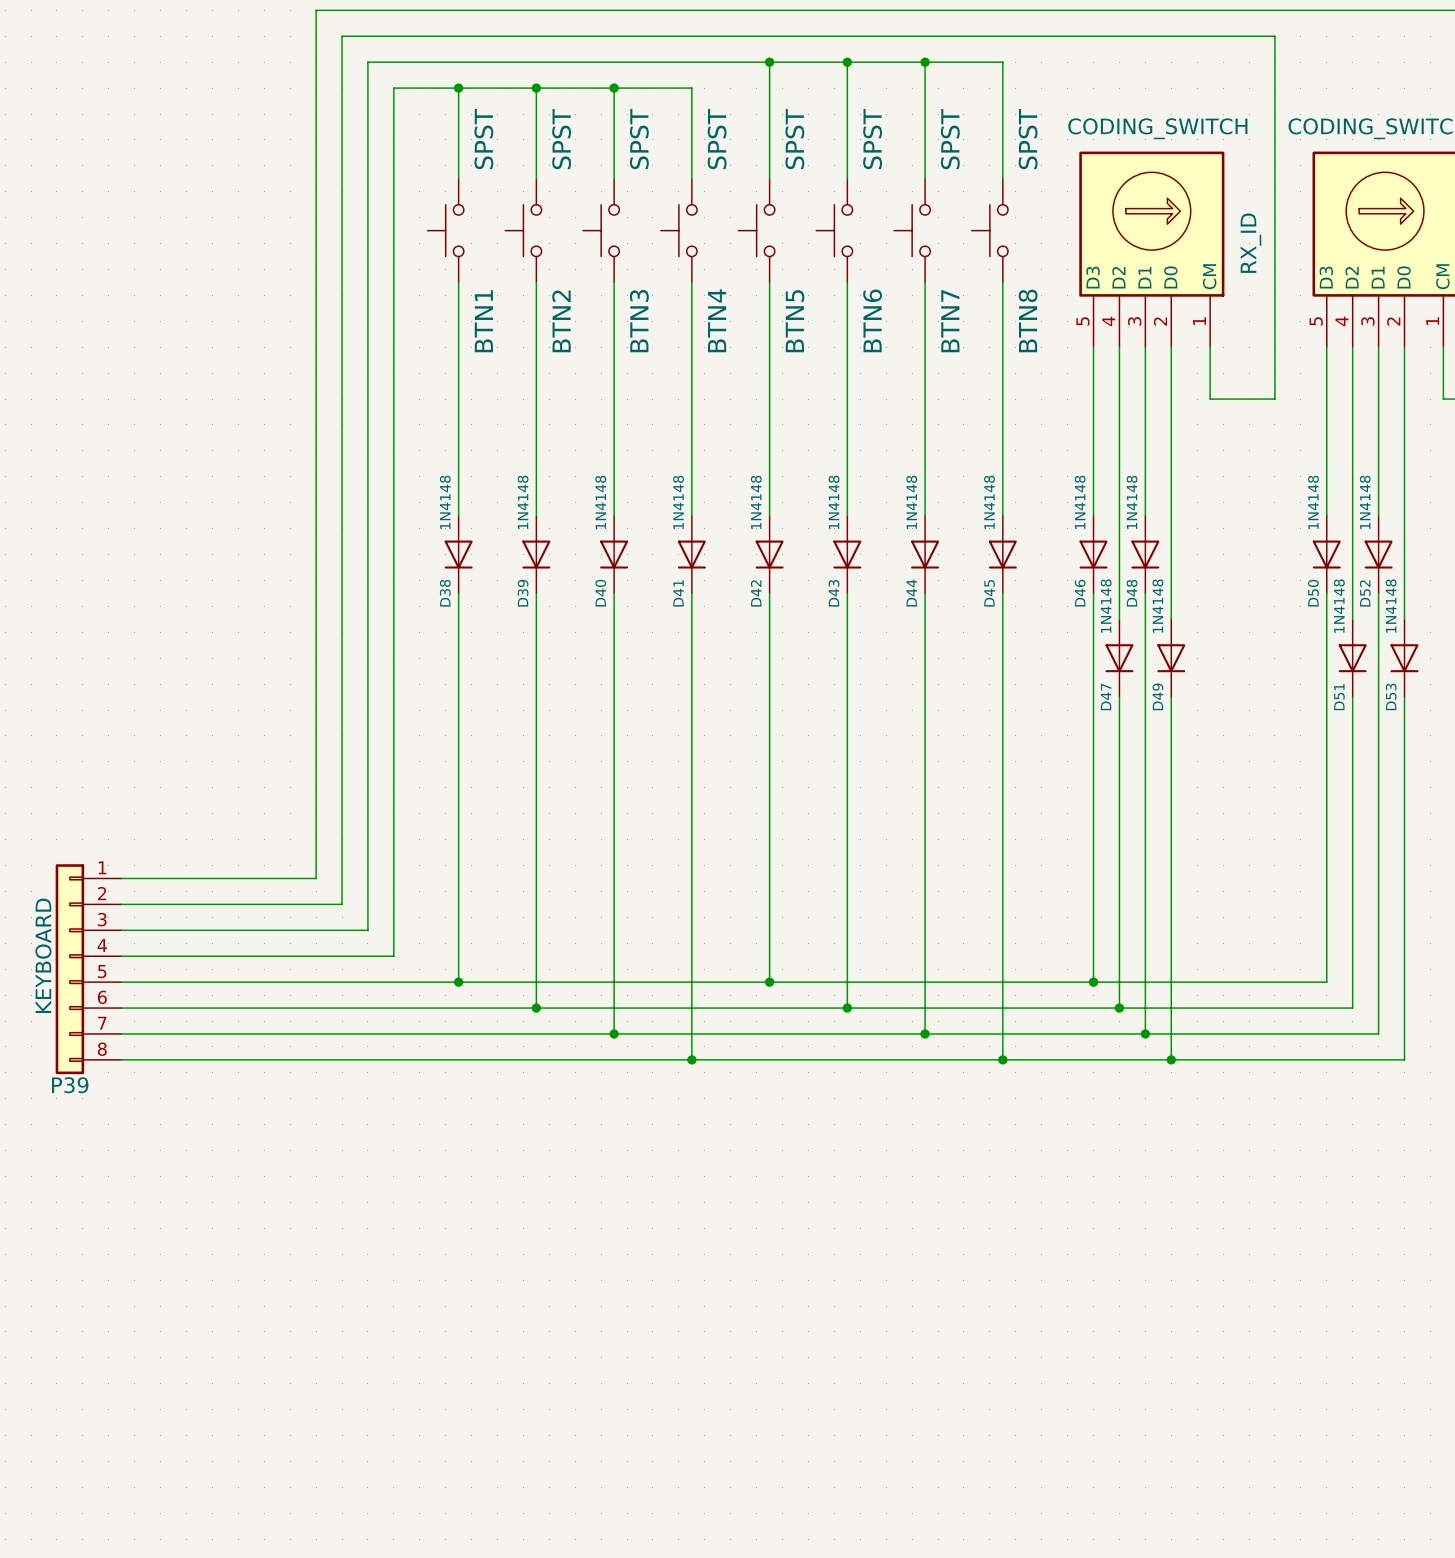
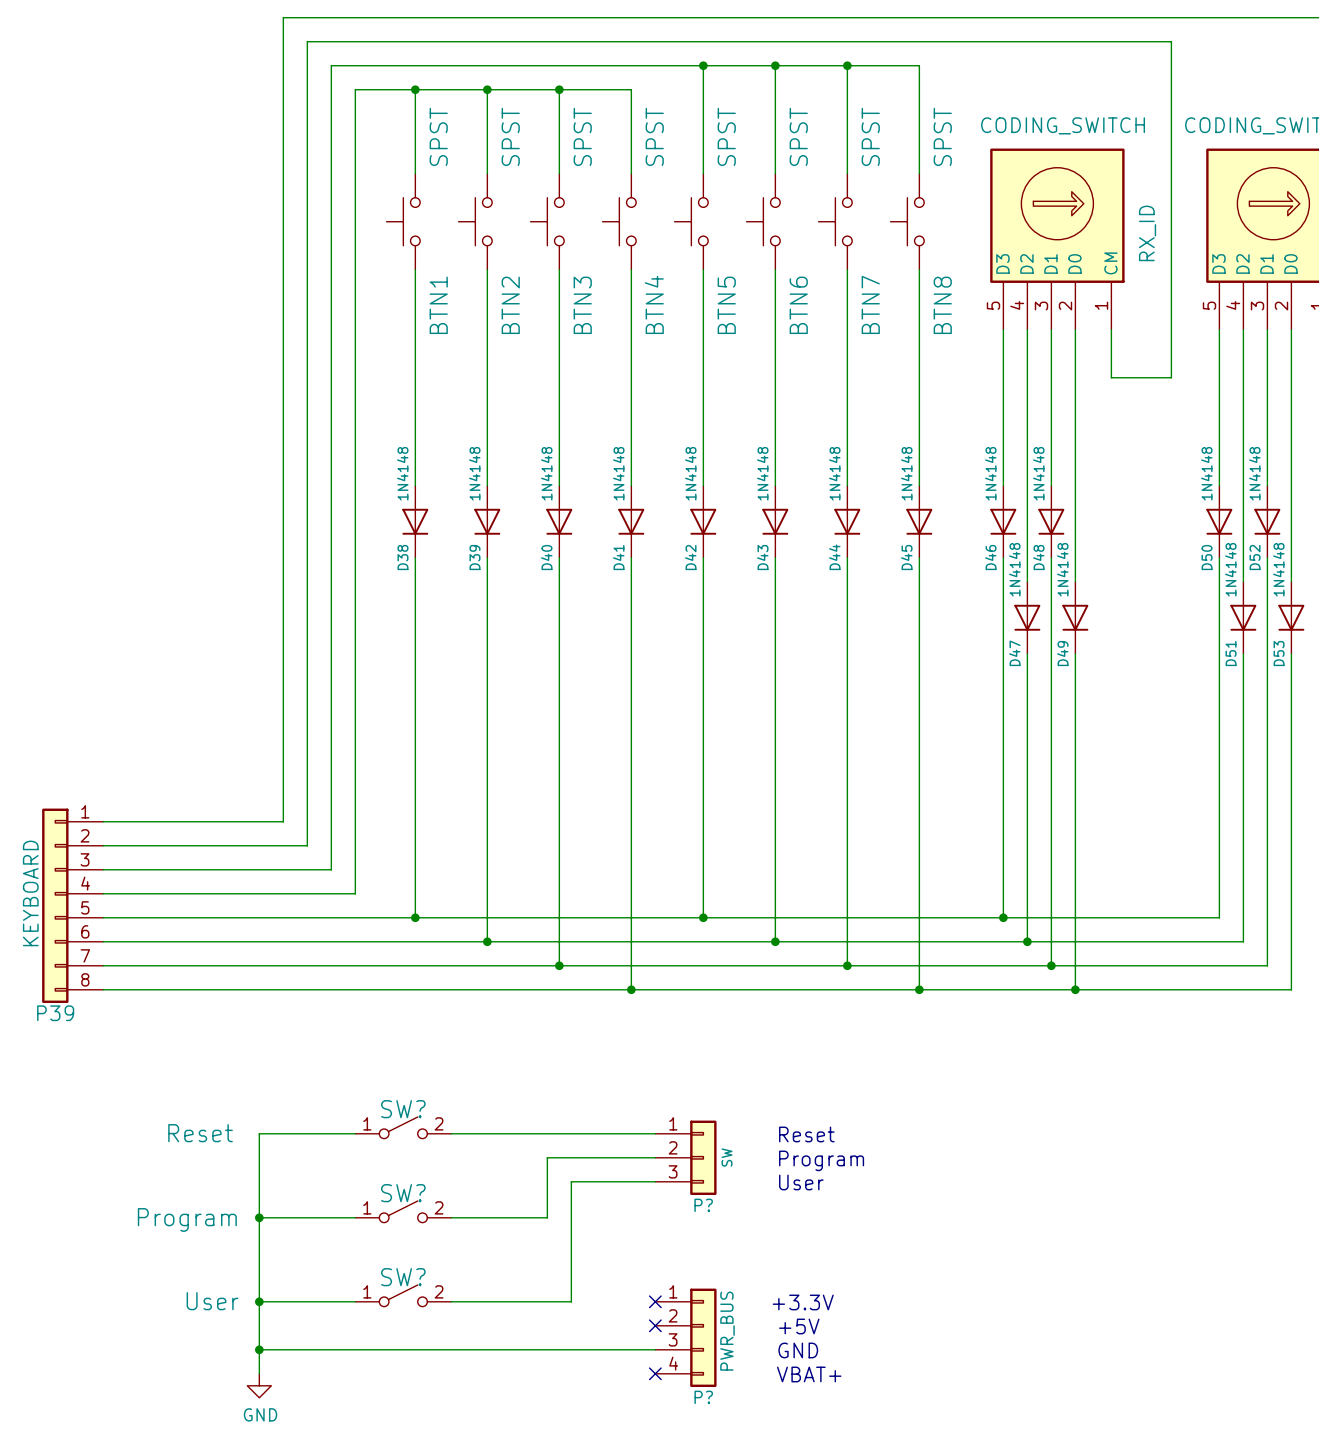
SW?: none -> Reset (403, 1127)
wire: none -> (355, 1133) (259, 1133) (259, 1373)
wire: none -> (451, 1133) (655, 1133)
text: none -> Reset (806, 1134)
wire: none -> (655, 1157) (547, 1157) (547, 1217) (451, 1217)
P?: none -> SW (685, 1157)
text: none -> Program (821, 1160)
wire: none -> (655, 1181) (571, 1181) (571, 1301) (451, 1301)
text: none -> User (801, 1182)
SW?: none -> Program (403, 1211)
wire: none -> (259, 1217) (355, 1217)
junction: none -> (259, 1217)
SW?: none -> User (403, 1295)
wire: none -> (259, 1301) (355, 1301)
junction: none -> (259, 1301)
no-connect mark: none -> (655, 1301)
text: none -> +3.3V (803, 1302)
no-connect mark: none -> (655, 1325)
text: none -> +5V (799, 1326)
P?: none -> PWR_BUS (685, 1337)
wire: none -> (259, 1349) (655, 1349)
junction: none -> (259, 1349)
text: none -> GND (798, 1350)
no-connect mark: none -> (655, 1373)
text: none -> VBAT+ (809, 1374)
power symbol: none -> GND (259, 1385)

